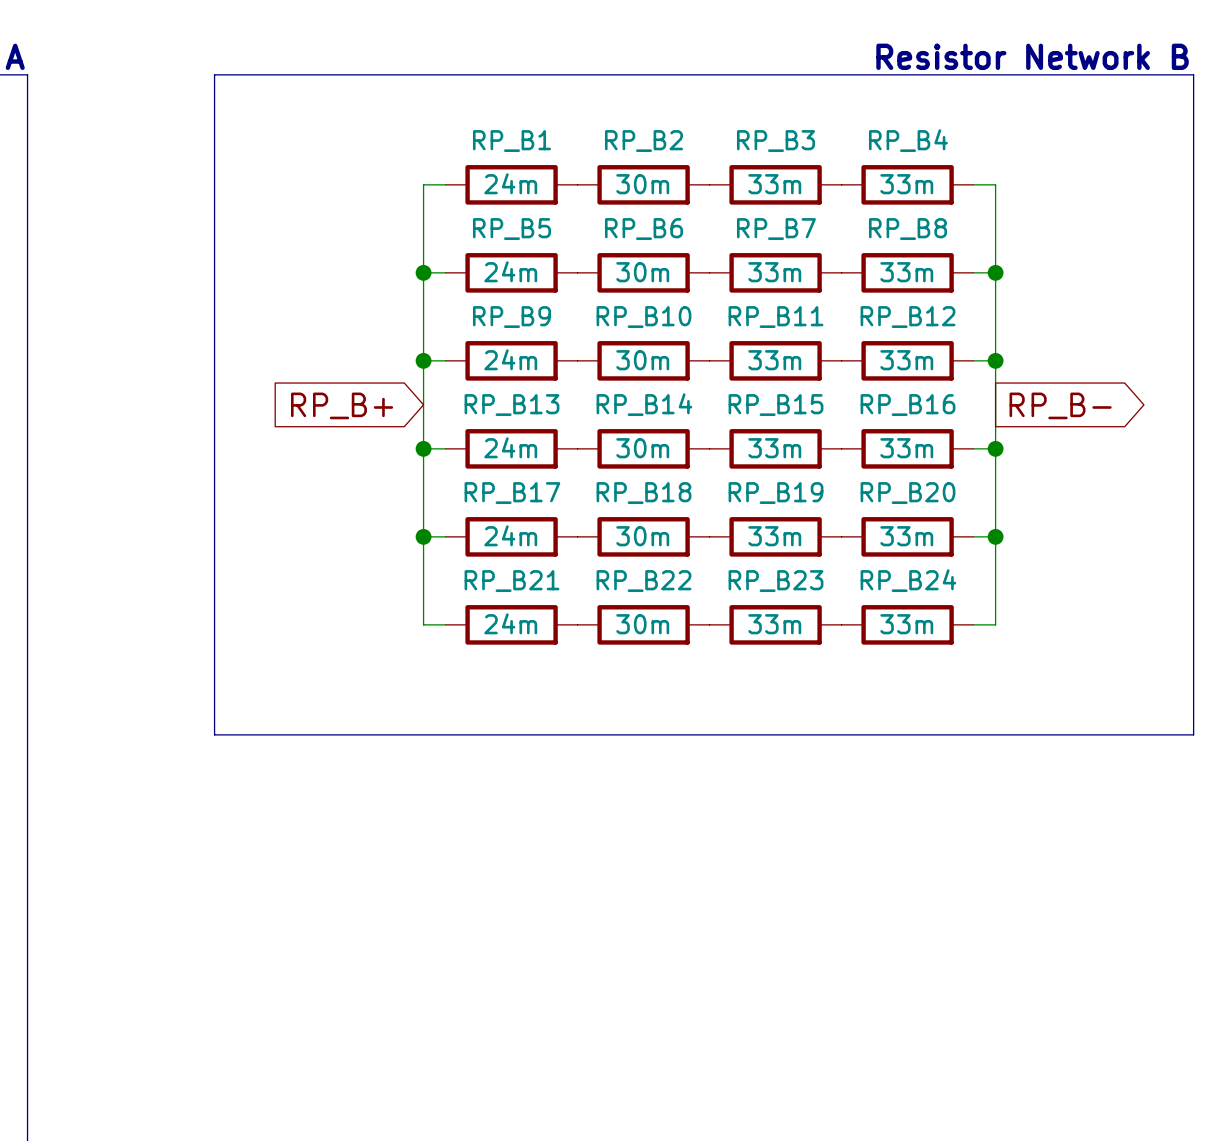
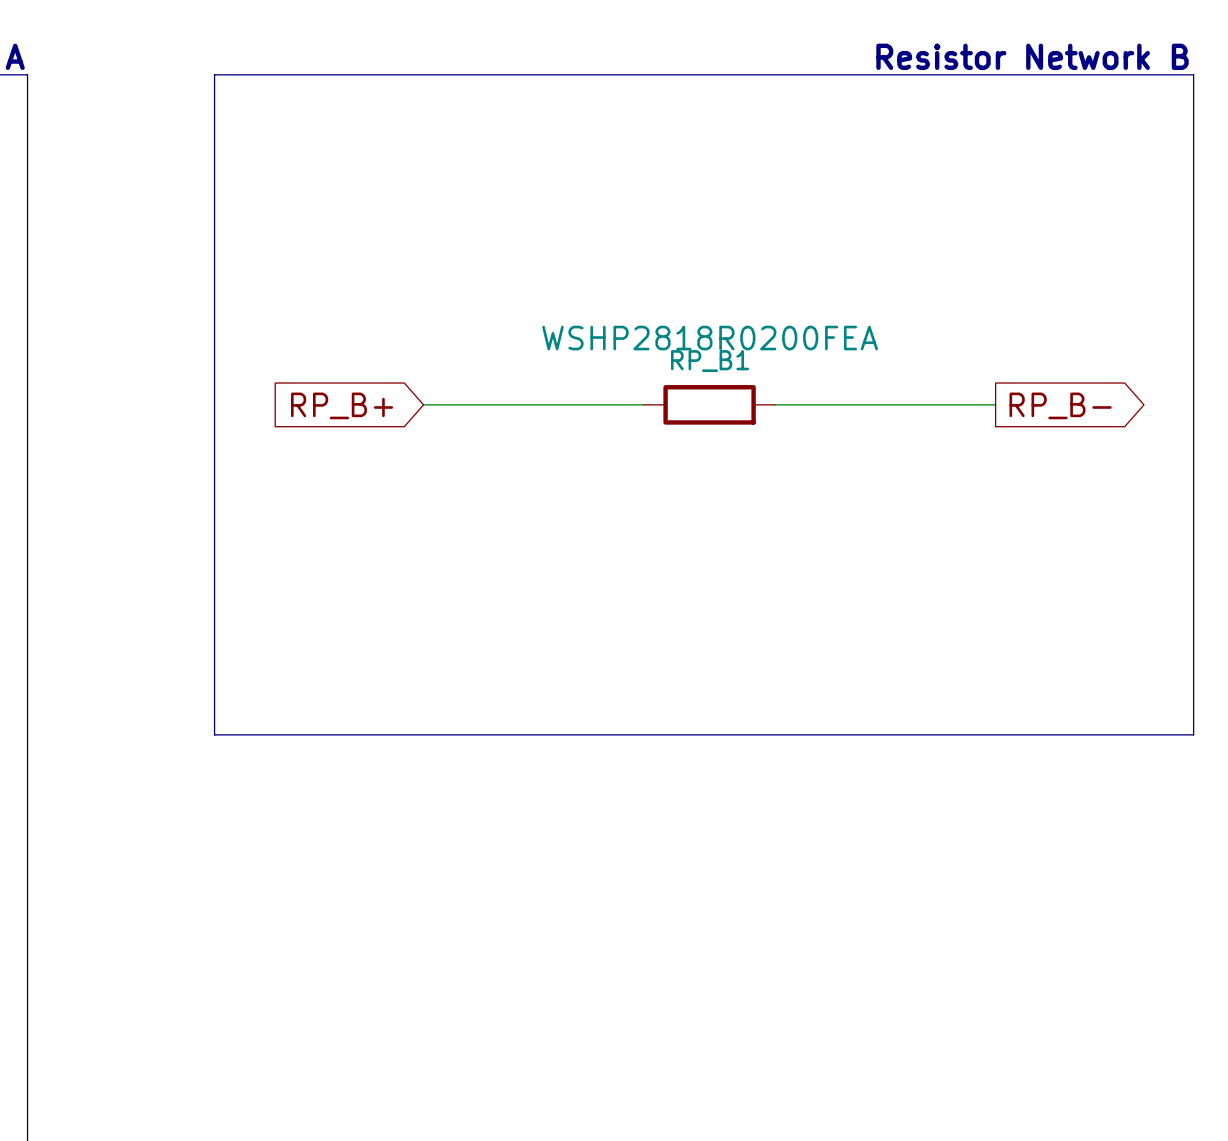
RP_B1 value: 24m (510, 183) -> WSHP2818R0200FEA (710, 338)
wire: (445, 184) (423, 184) (423, 624) (445, 624) -> none
RP_B1 position: (511, 184) -> (709, 404)
RP_B2: 30m (643, 184) -> none
RP_B3: 33m (775, 184) -> none
RP_B4: 33m (907, 184) -> none
wire: (973, 184) (995, 184) (995, 624) (973, 624) -> none
wire: (423, 272) (445, 272) -> none
junction: (423, 272) -> none
RP_B5: 24m (511, 272) -> none
RP_B6: 30m (643, 272) -> none
RP_B7: 33m (775, 272) -> none
RP_B8: 33m (907, 272) -> none
wire: (973, 272) (995, 272) -> none
junction: (995, 272) -> none
wire: (423, 360) (445, 360) -> none
junction: (423, 360) -> none
RP_B9: 24m (511, 360) -> none
RP_B10: 30m (643, 360) -> none
RP_B11: 33m (775, 360) -> none
RP_B12: 33m (907, 360) -> none
wire: (973, 360) (995, 360) -> none
junction: (995, 360) -> none
wire: none -> (423, 404) (643, 404)
wire: none -> (775, 404) (995, 404)
wire: (423, 448) (445, 448) -> none
junction: (423, 448) -> none
RP_B13: 24m (511, 448) -> none
RP_B14: 30m (643, 448) -> none
RP_B15: 33m (775, 448) -> none
RP_B16: 33m (907, 448) -> none
wire: (973, 448) (995, 448) -> none
junction: (995, 448) -> none
wire: (423, 536) (445, 536) -> none
junction: (423, 536) -> none
RP_B17: 24m (511, 536) -> none
RP_B18: 30m (643, 536) -> none
RP_B19: 33m (775, 536) -> none
RP_B20: 33m (907, 536) -> none
wire: (973, 536) (995, 536) -> none
junction: (995, 536) -> none
RP_B21: 24m (511, 624) -> none
RP_B22: 30m (643, 624) -> none
RP_B23: 33m (775, 624) -> none
RP_B24: 33m (907, 624) -> none

